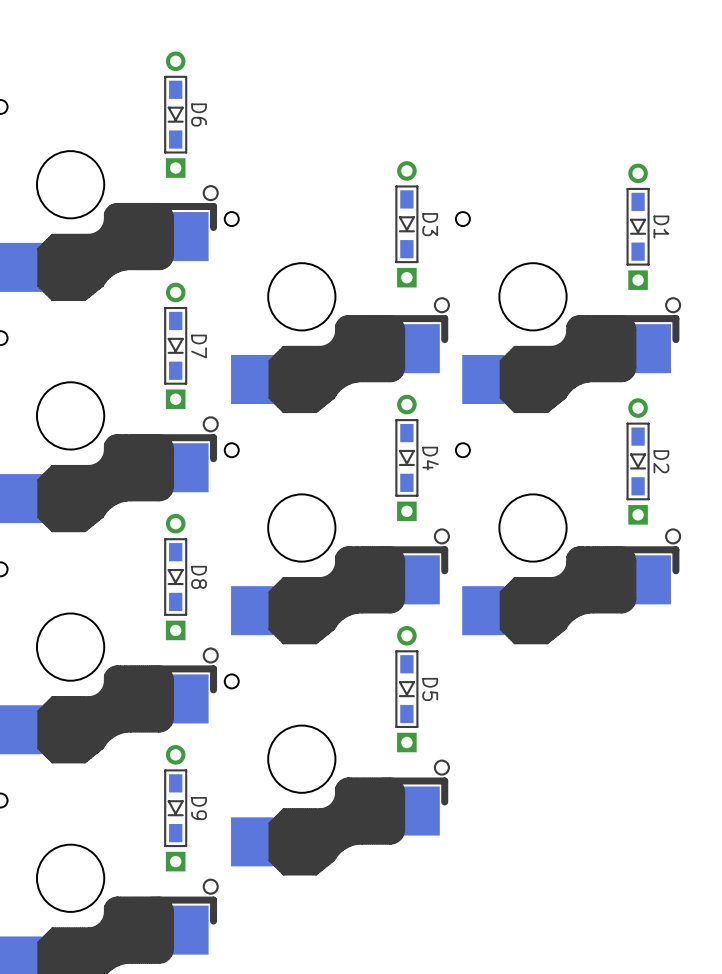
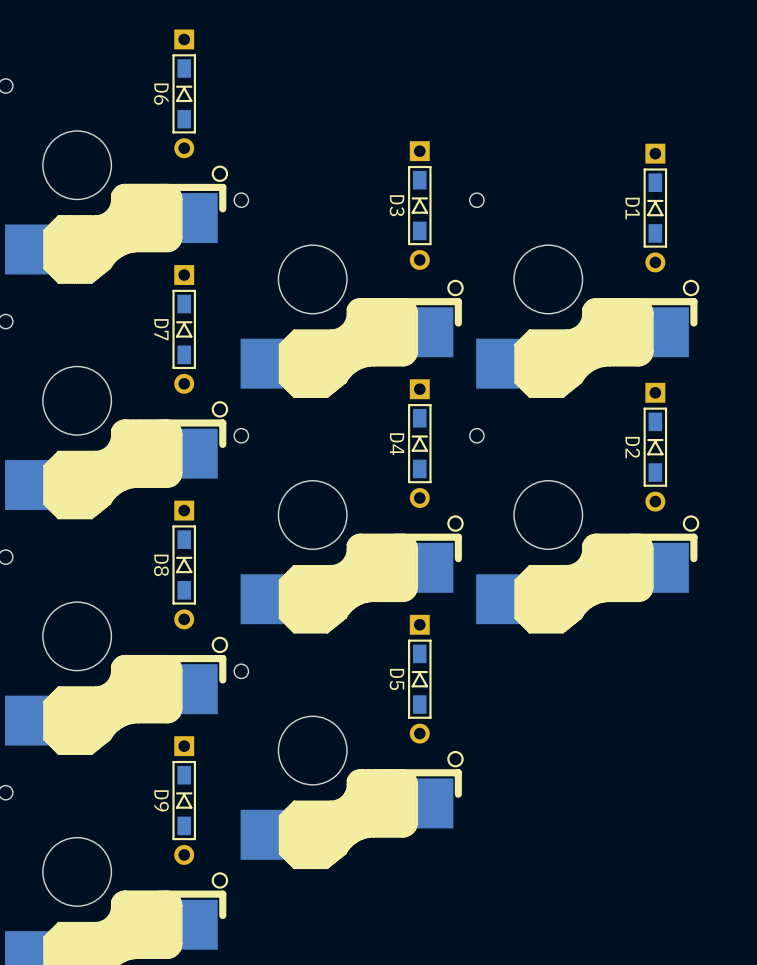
D6 rotation: 0° (175, 114) -> 180° (184, 93)
D3 rotation: 0° (406, 224) -> 180° (419, 205)
D1 rotation: 0° (638, 226) -> 180° (655, 208)
D7 rotation: 0° (175, 345) -> 180° (184, 329)
D4 rotation: 0° (406, 457) -> 180° (419, 443)
D2 rotation: 0° (638, 461) -> 180° (655, 447)
D8 rotation: 0° (175, 577) -> 180° (184, 564)
D5 rotation: 0° (406, 689) -> 180° (419, 679)
D9 rotation: 0° (175, 808) -> 180° (184, 800)

